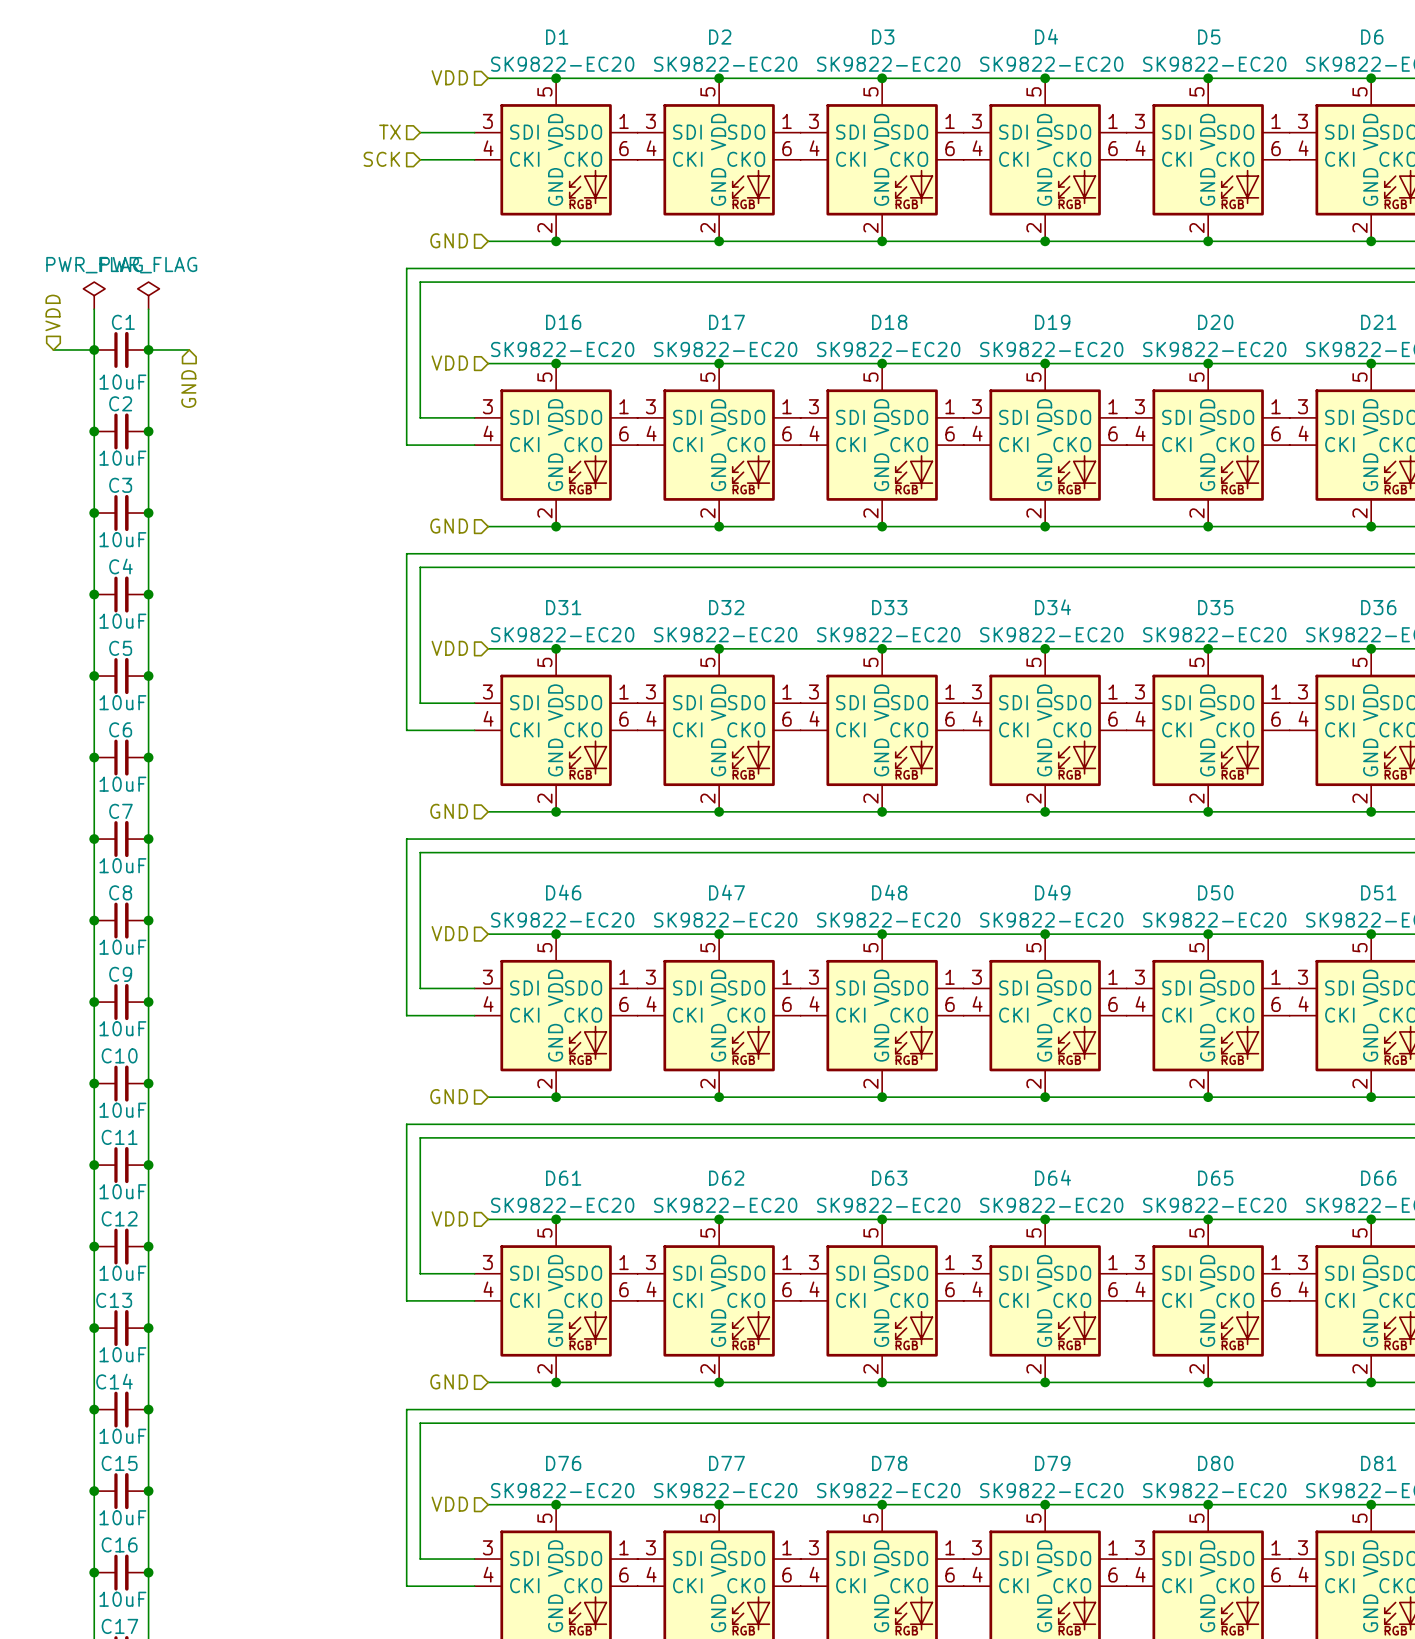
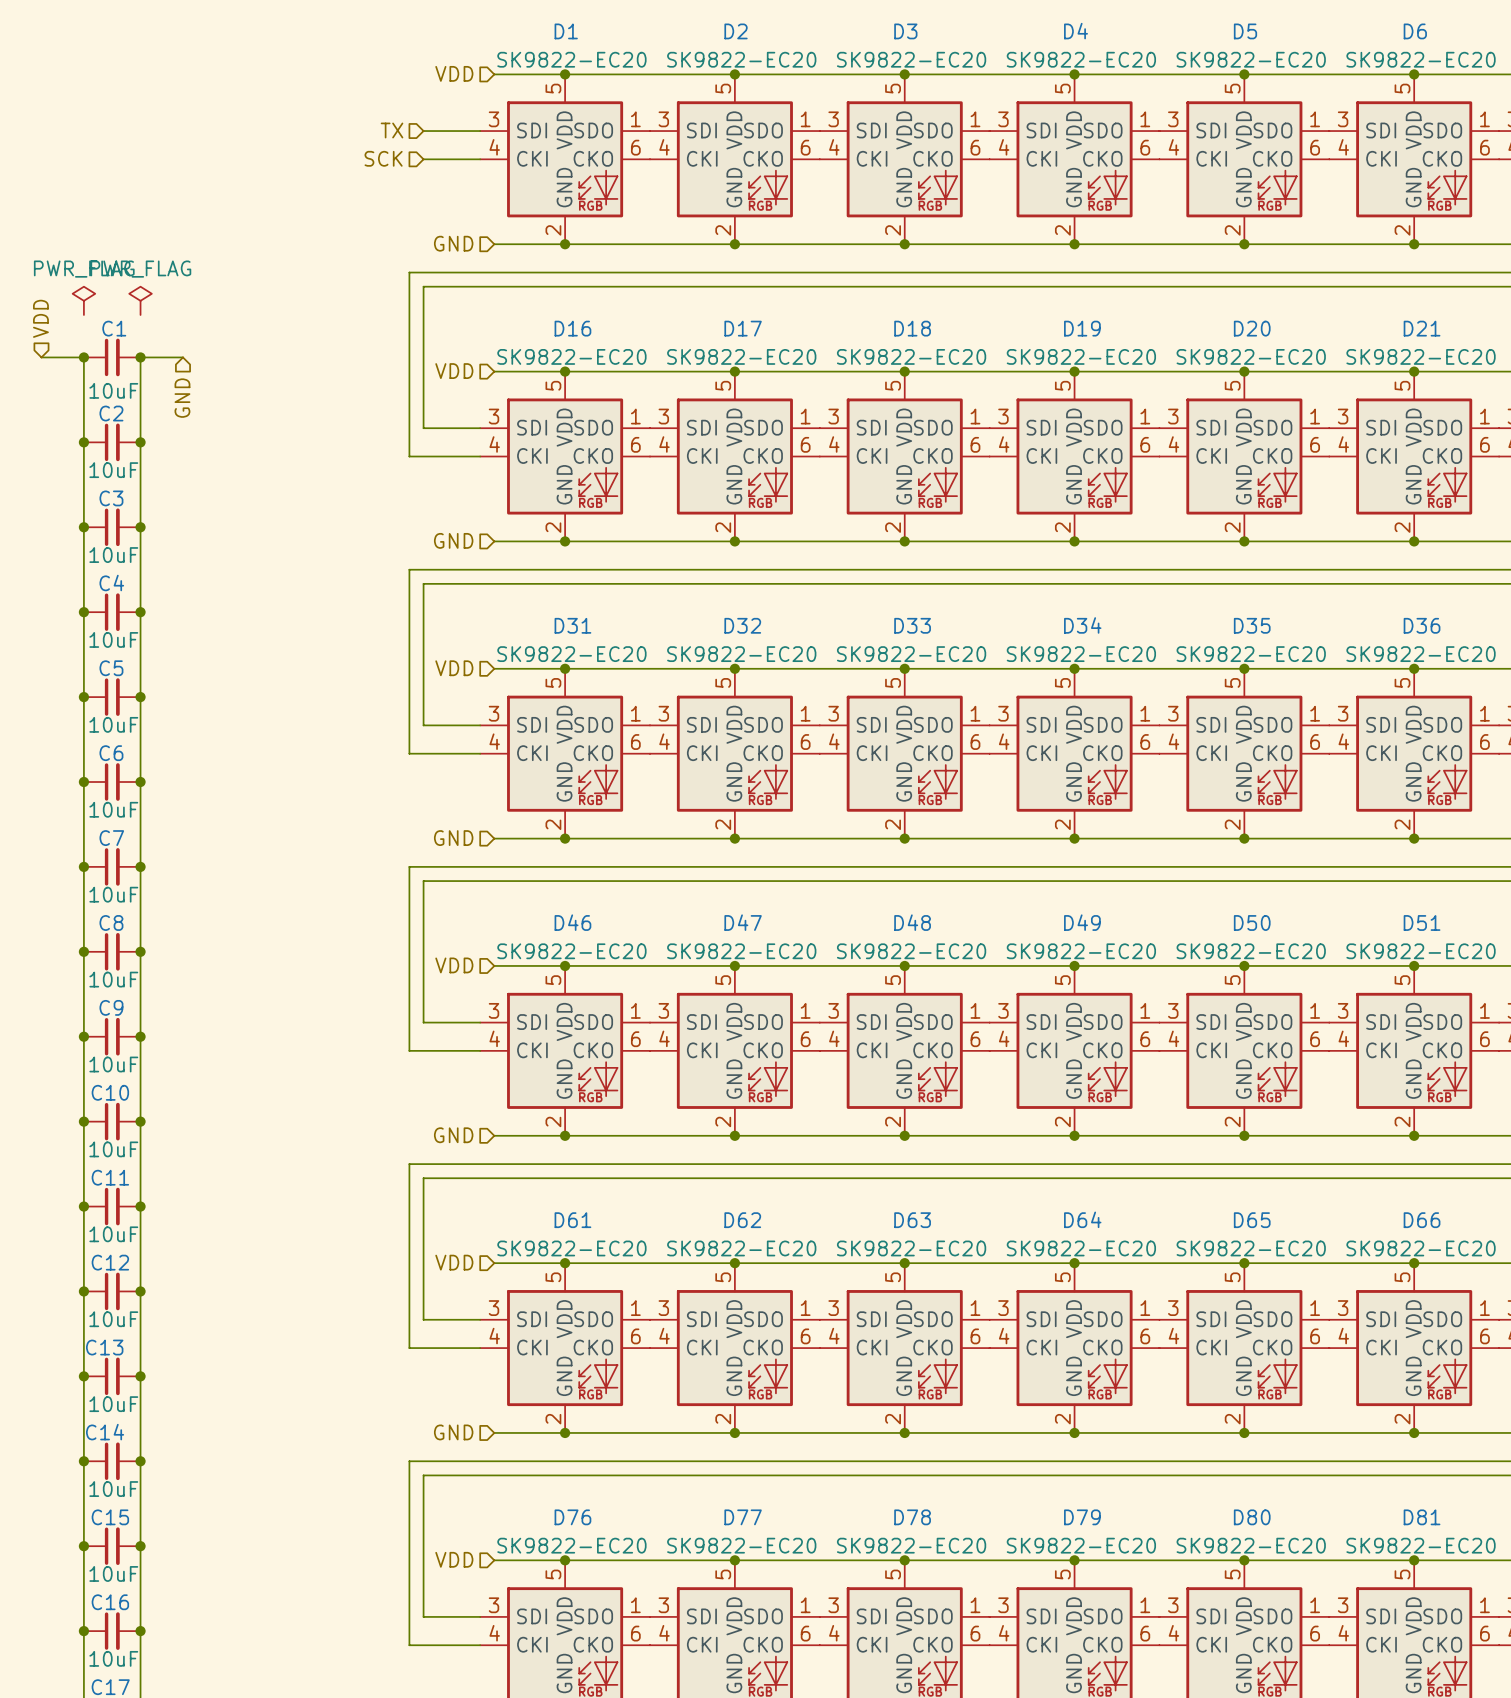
wire: (94, 309) (94, 349) -> none
wire: (148, 309) (148, 349) -> none

